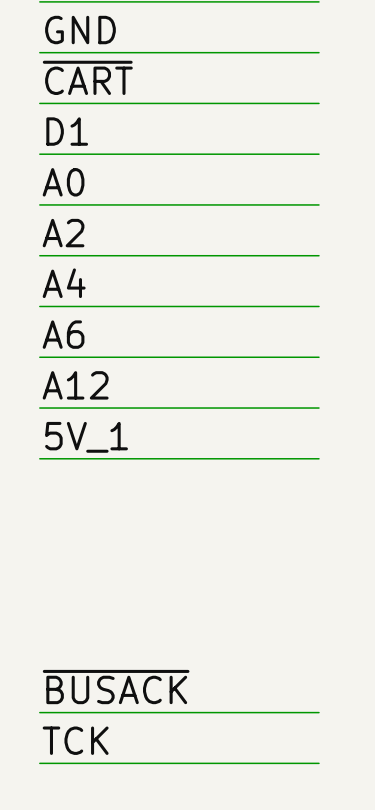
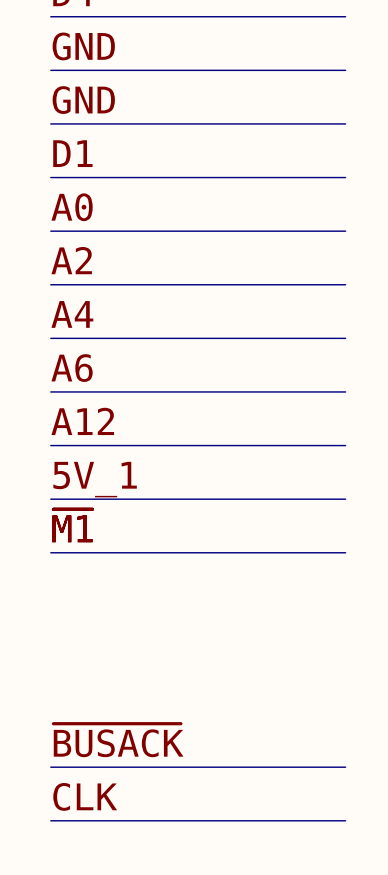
label: ~{CART} (87, 77) -> GND (83, 100)
label: none -> ~{M1} (72, 525)
wire: none -> (50, 552) (345, 552)
label: TCK (75, 740) -> CLK (85, 796)

